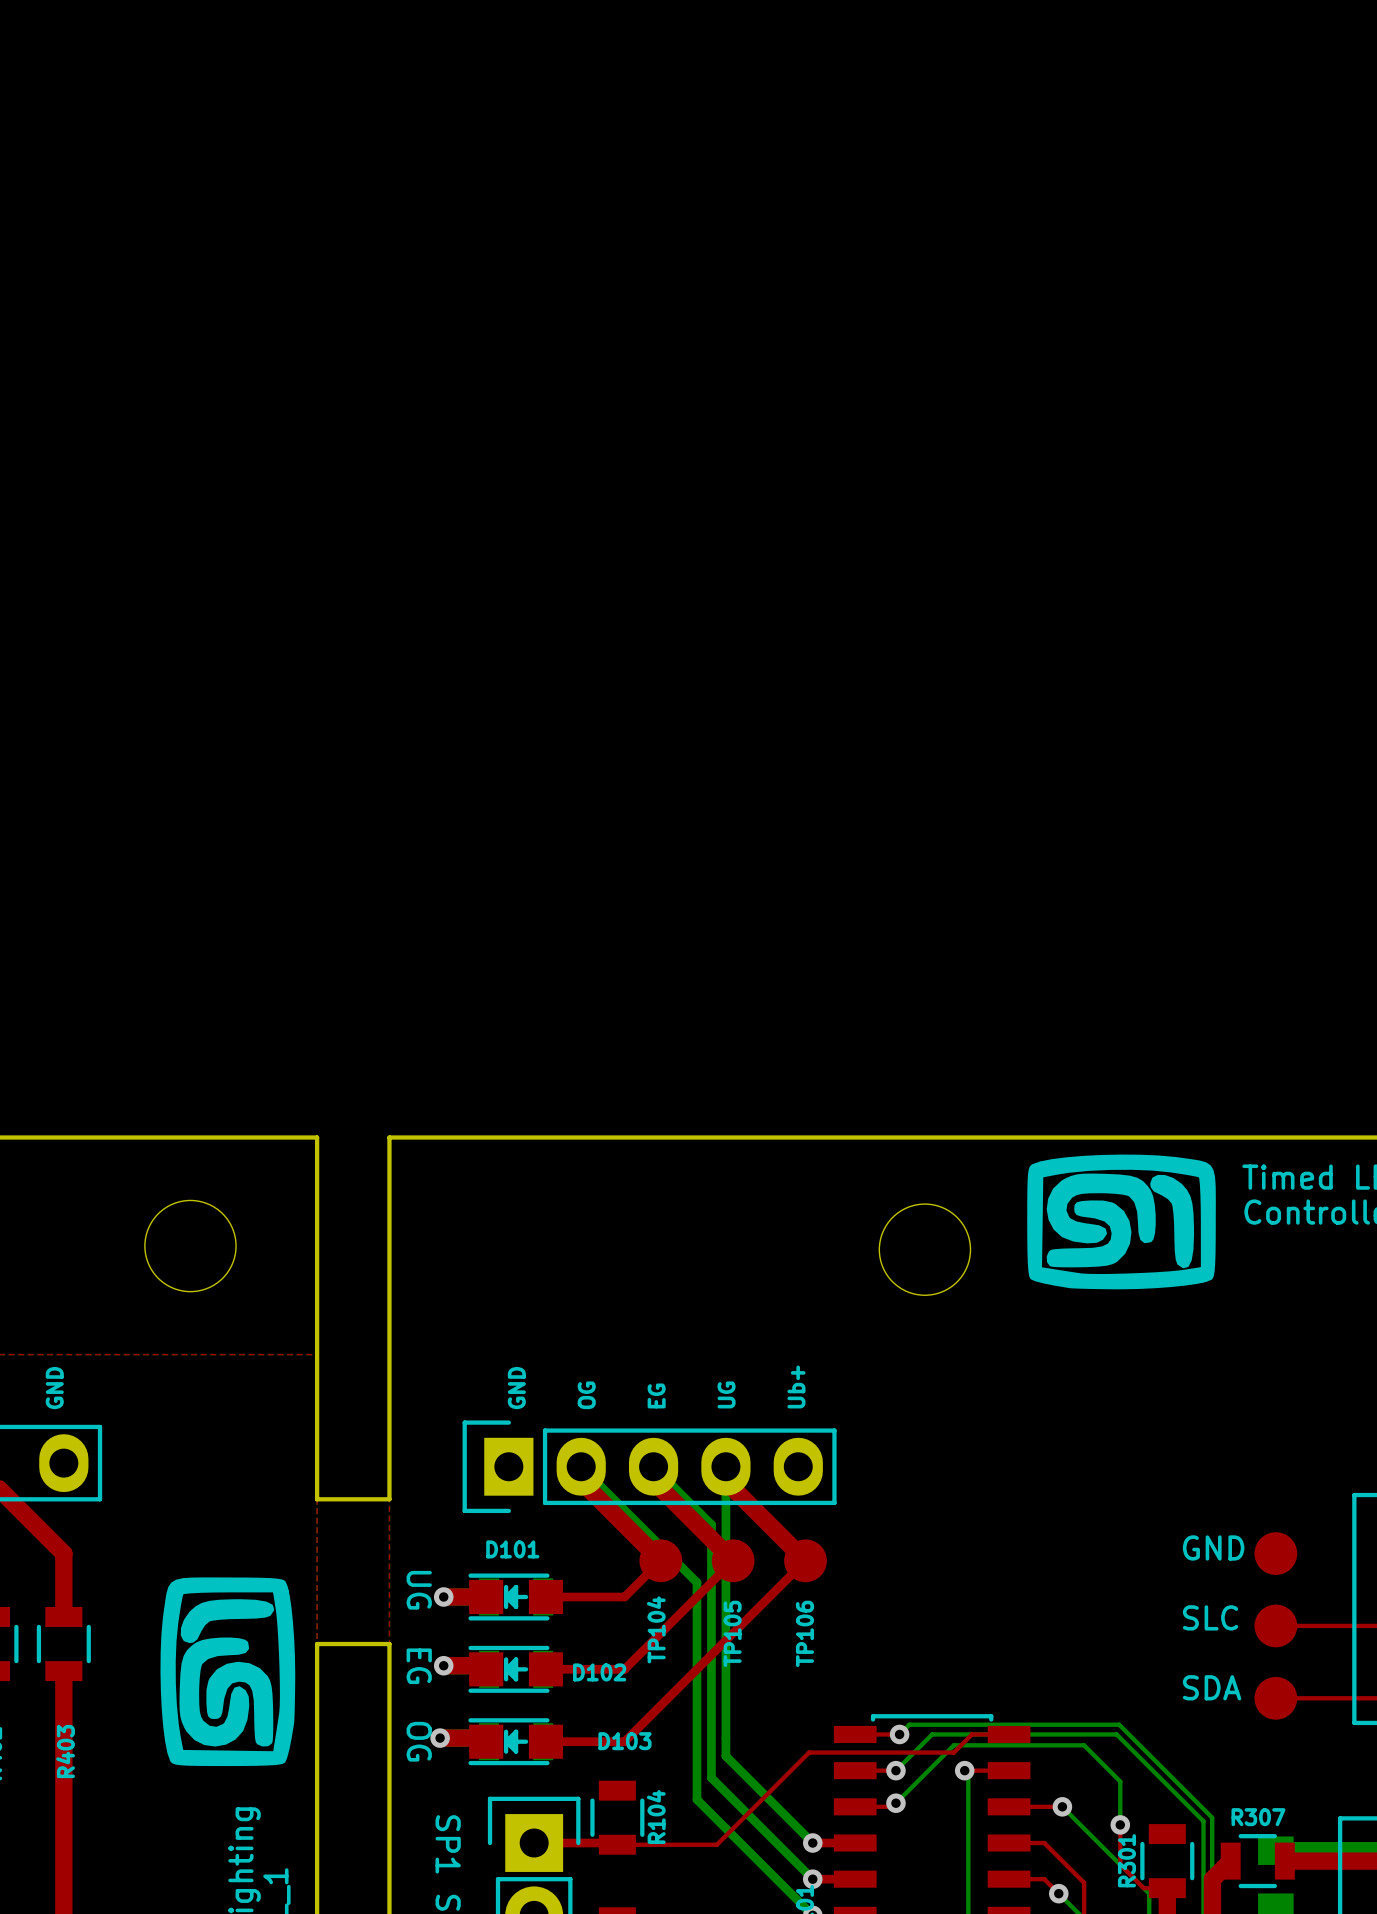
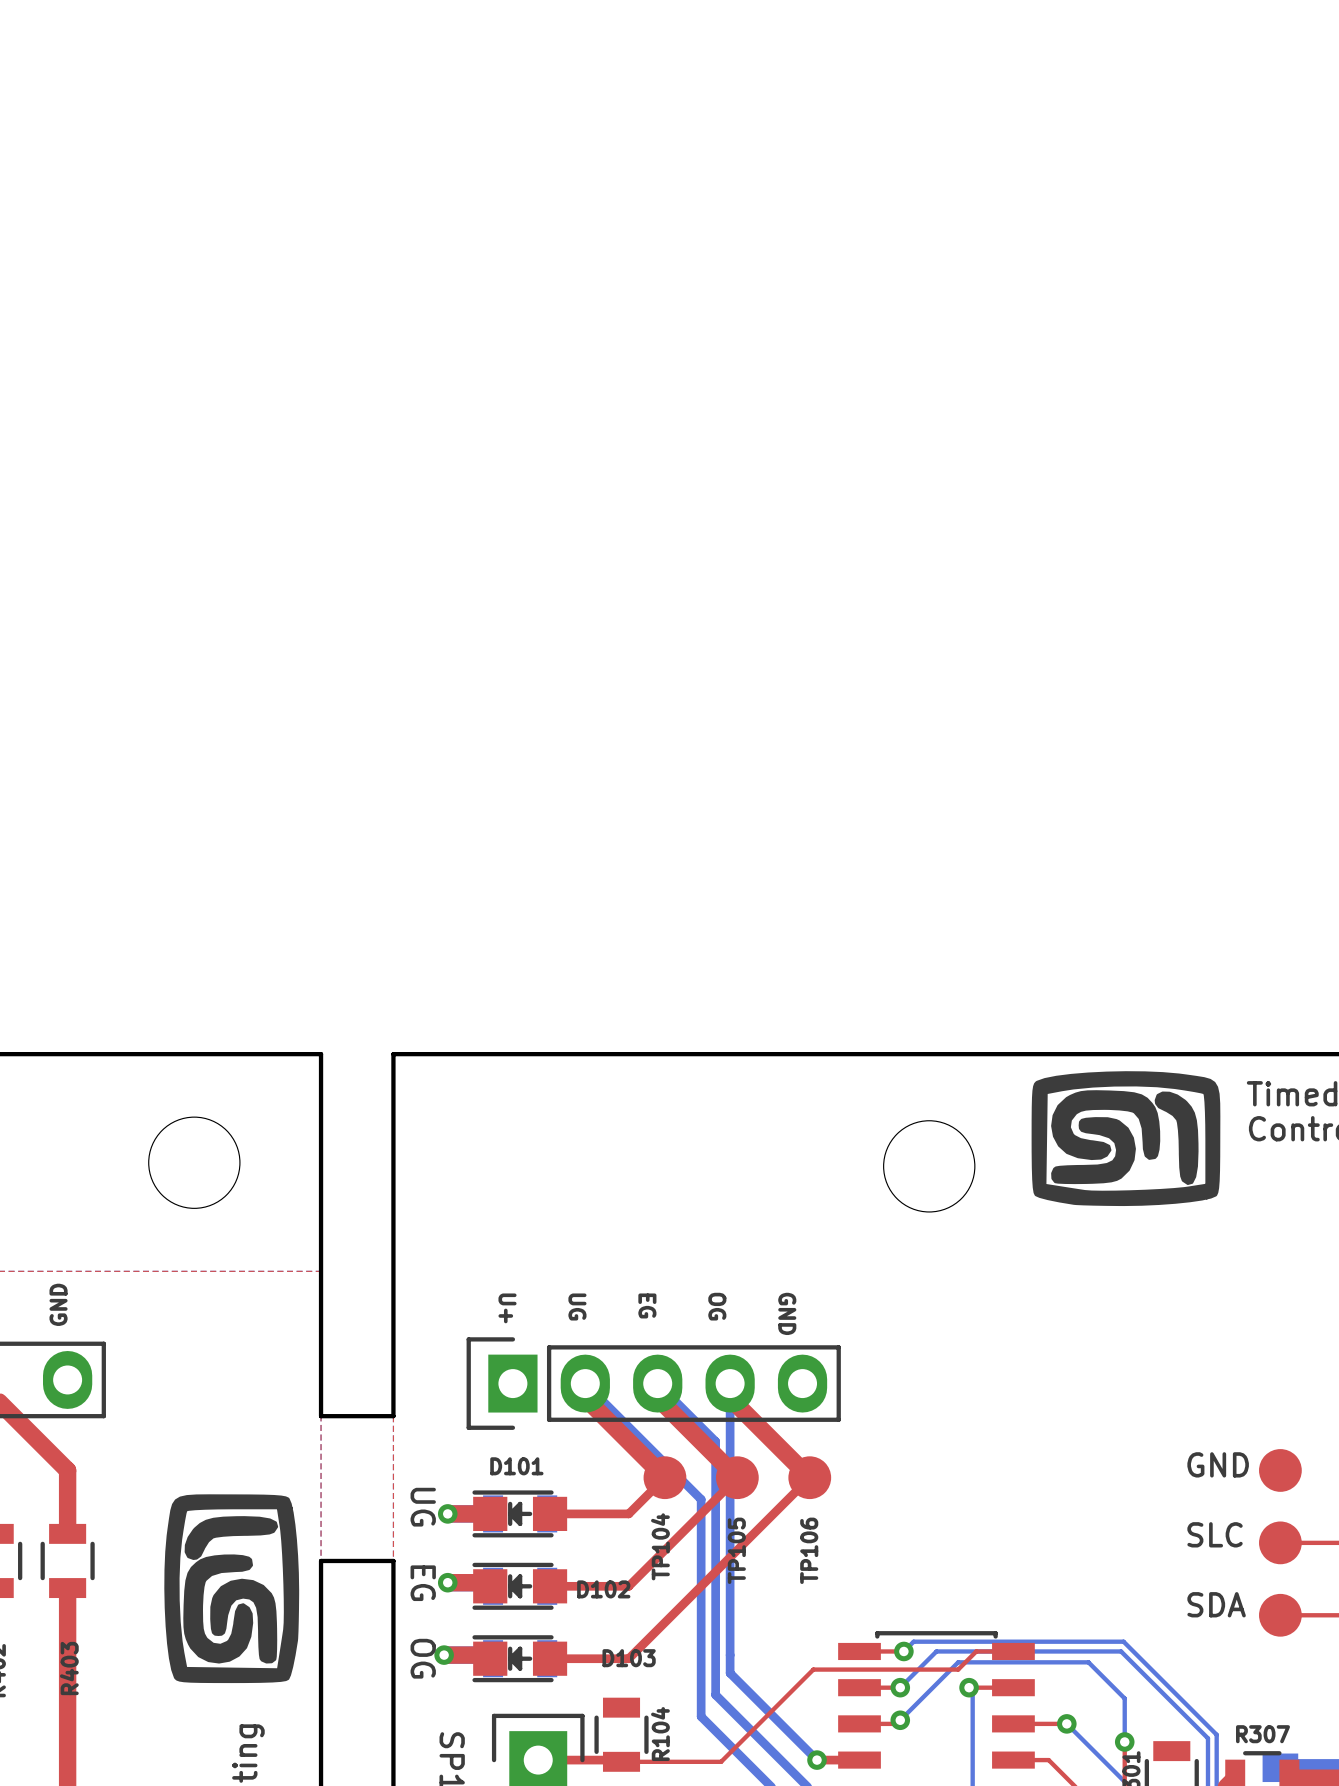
text: Ub+ (796, 1387) -> none
text rotation: 0° (516, 1388) -> 180° (787, 1313)
text position: GND (516, 1388) -> GND (787, 1313)
text: none -> U+ (507, 1308)
text rotation: 0° (726, 1394) -> 180° (577, 1307)
text position: UG (726, 1394) -> UG (577, 1307)
text rotation: 0° (586, 1395) -> 180° (717, 1306)
text position: OG (586, 1395) -> OG (717, 1306)
text rotation: 0° (656, 1395) -> 180° (647, 1305)

